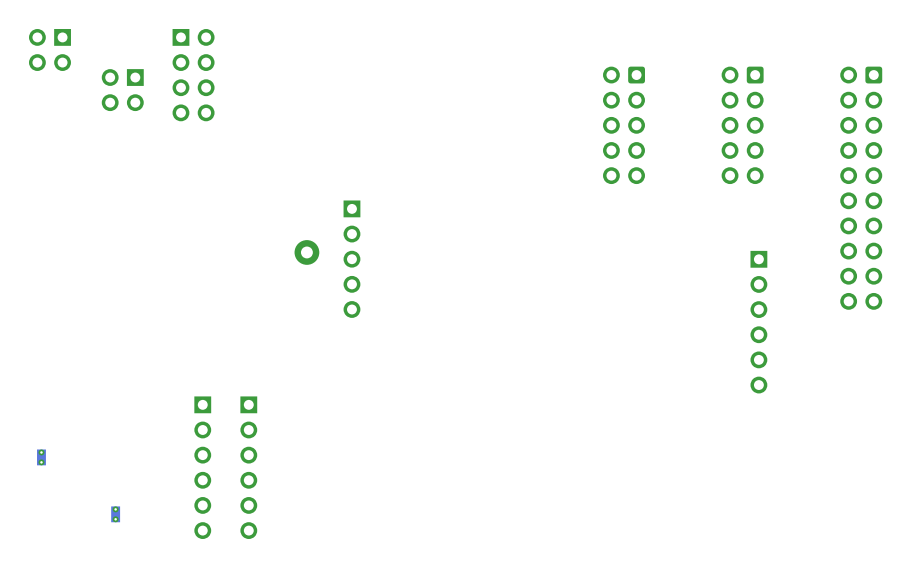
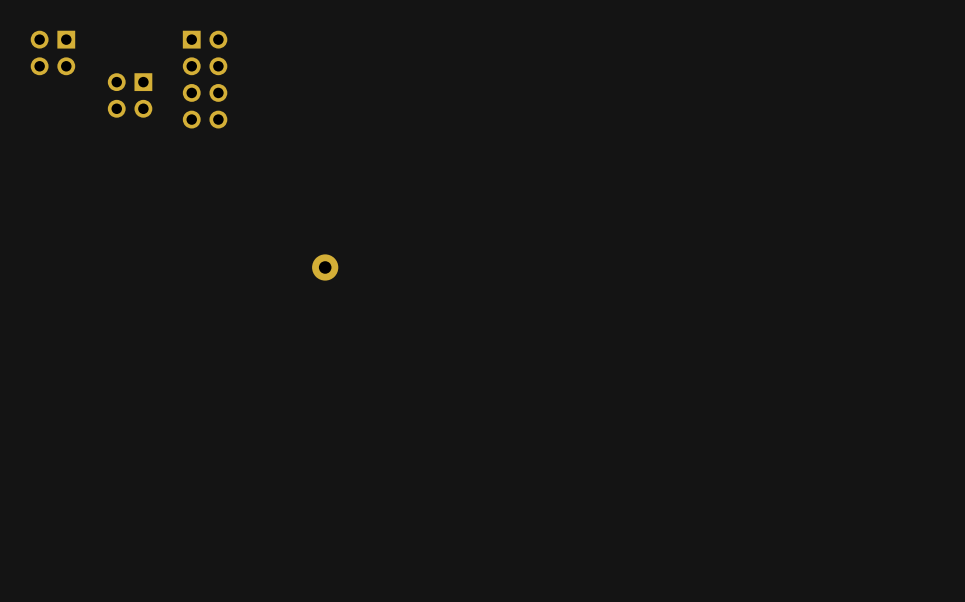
part: (624, 125) -> none
part: (742, 125) -> none
part: (861, 188) -> none
part: (351, 259) -> none
part: (758, 322) -> none
part: (41, 457) -> none
part: (202, 467) -> none
part: (248, 467) -> none
part: (115, 514) -> none

